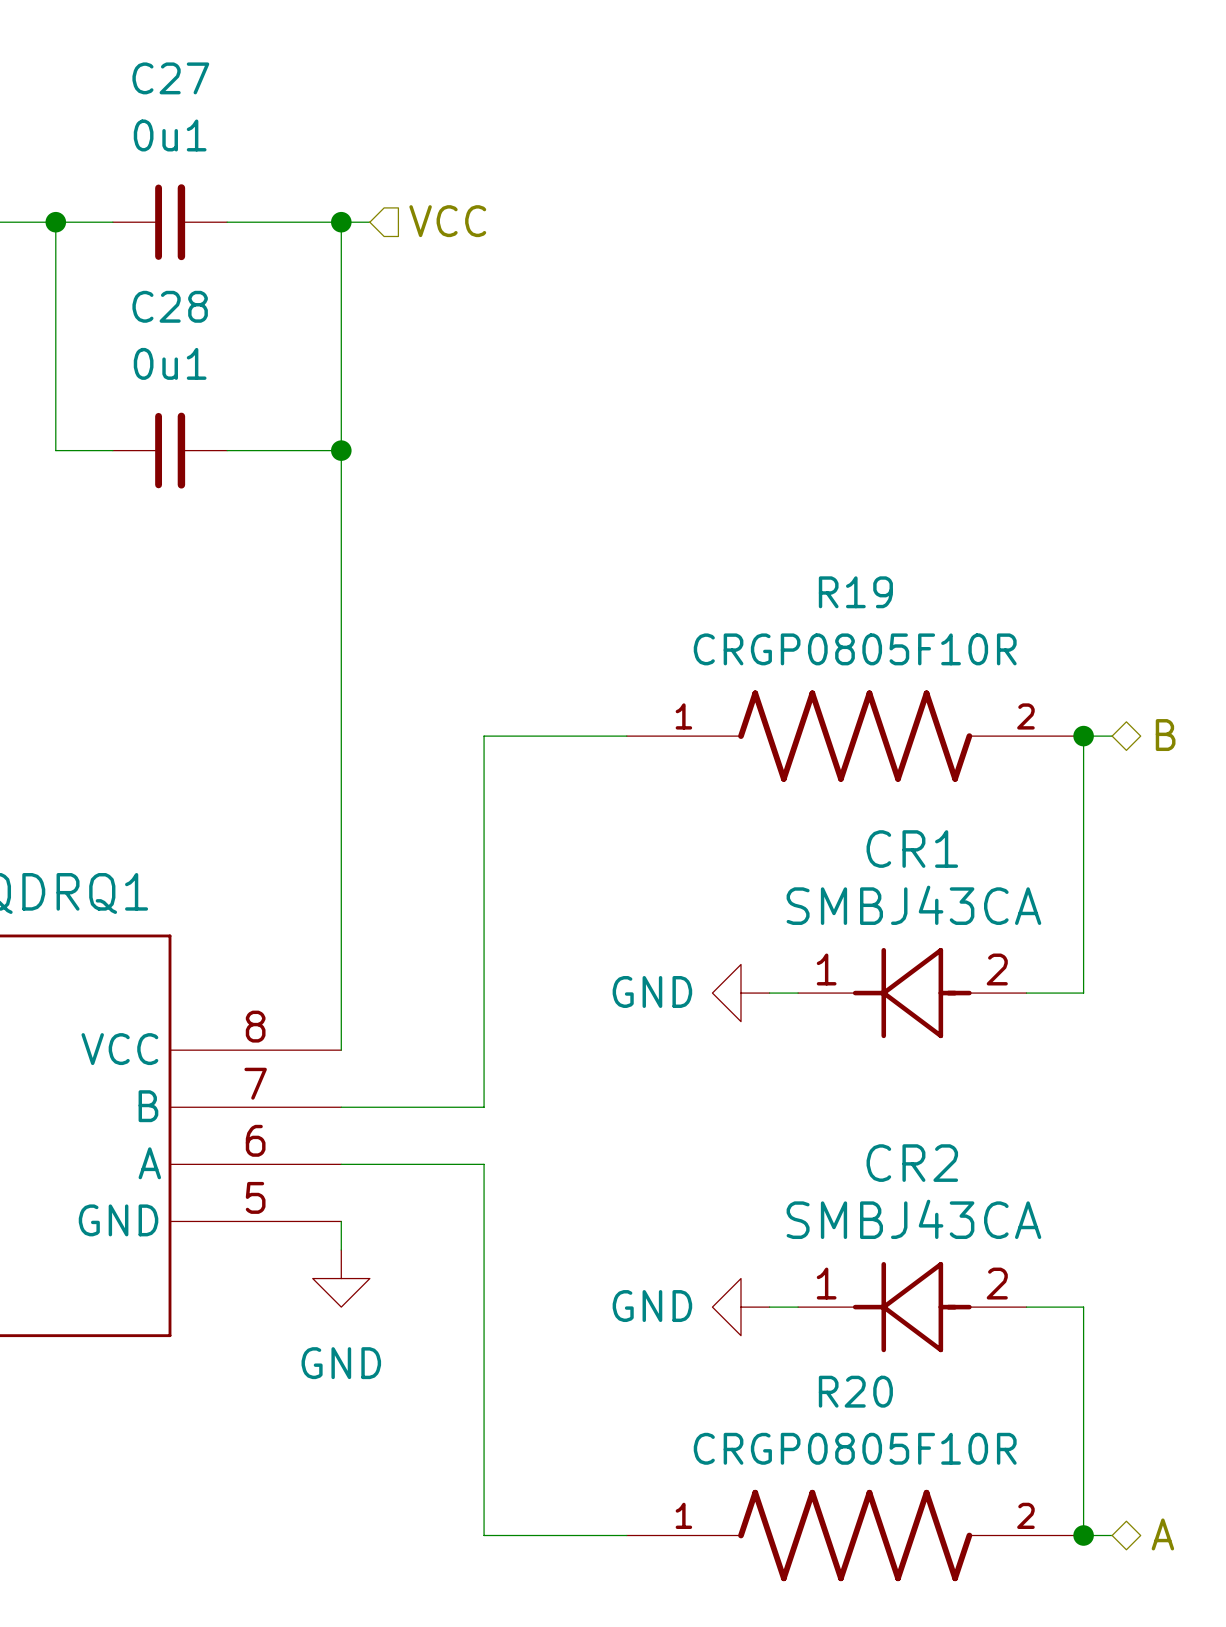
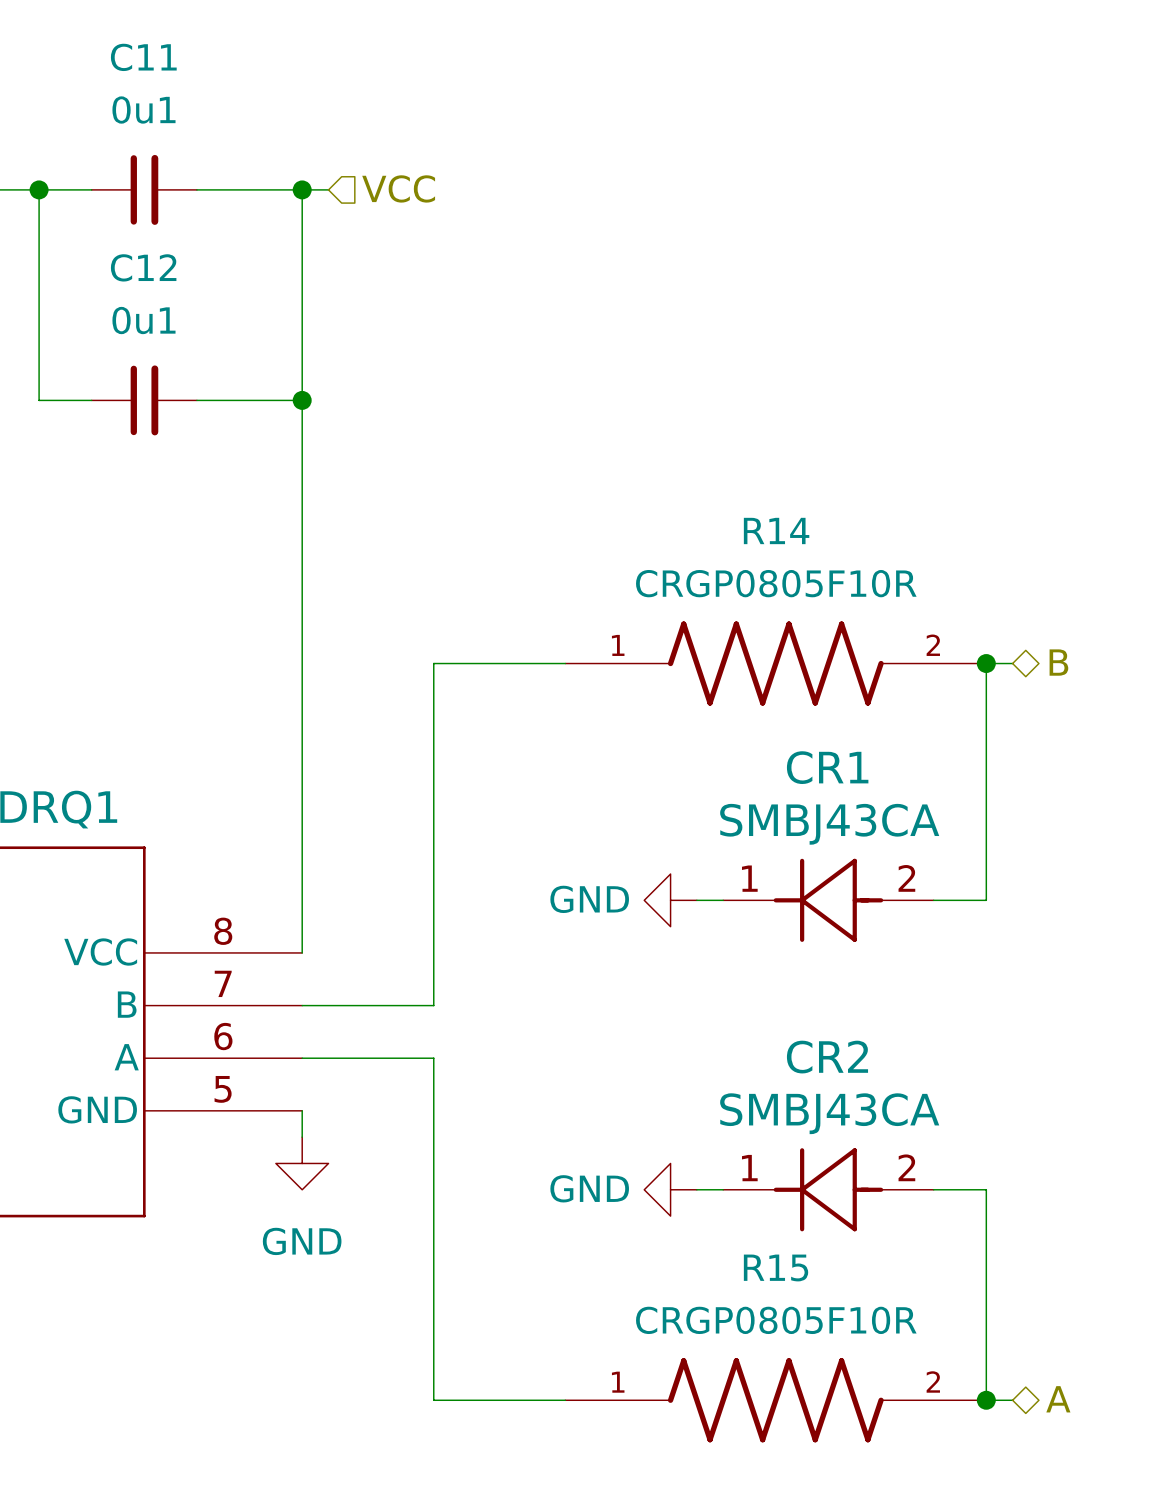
C27 name: C27 (170, 78) -> C11 (143, 57)
C28 name: C28 (170, 306) -> C12 (143, 267)
R19 name: R19 (855, 592) -> R14 (776, 530)
R20 name: R20 (855, 1391) -> R15 (776, 1267)

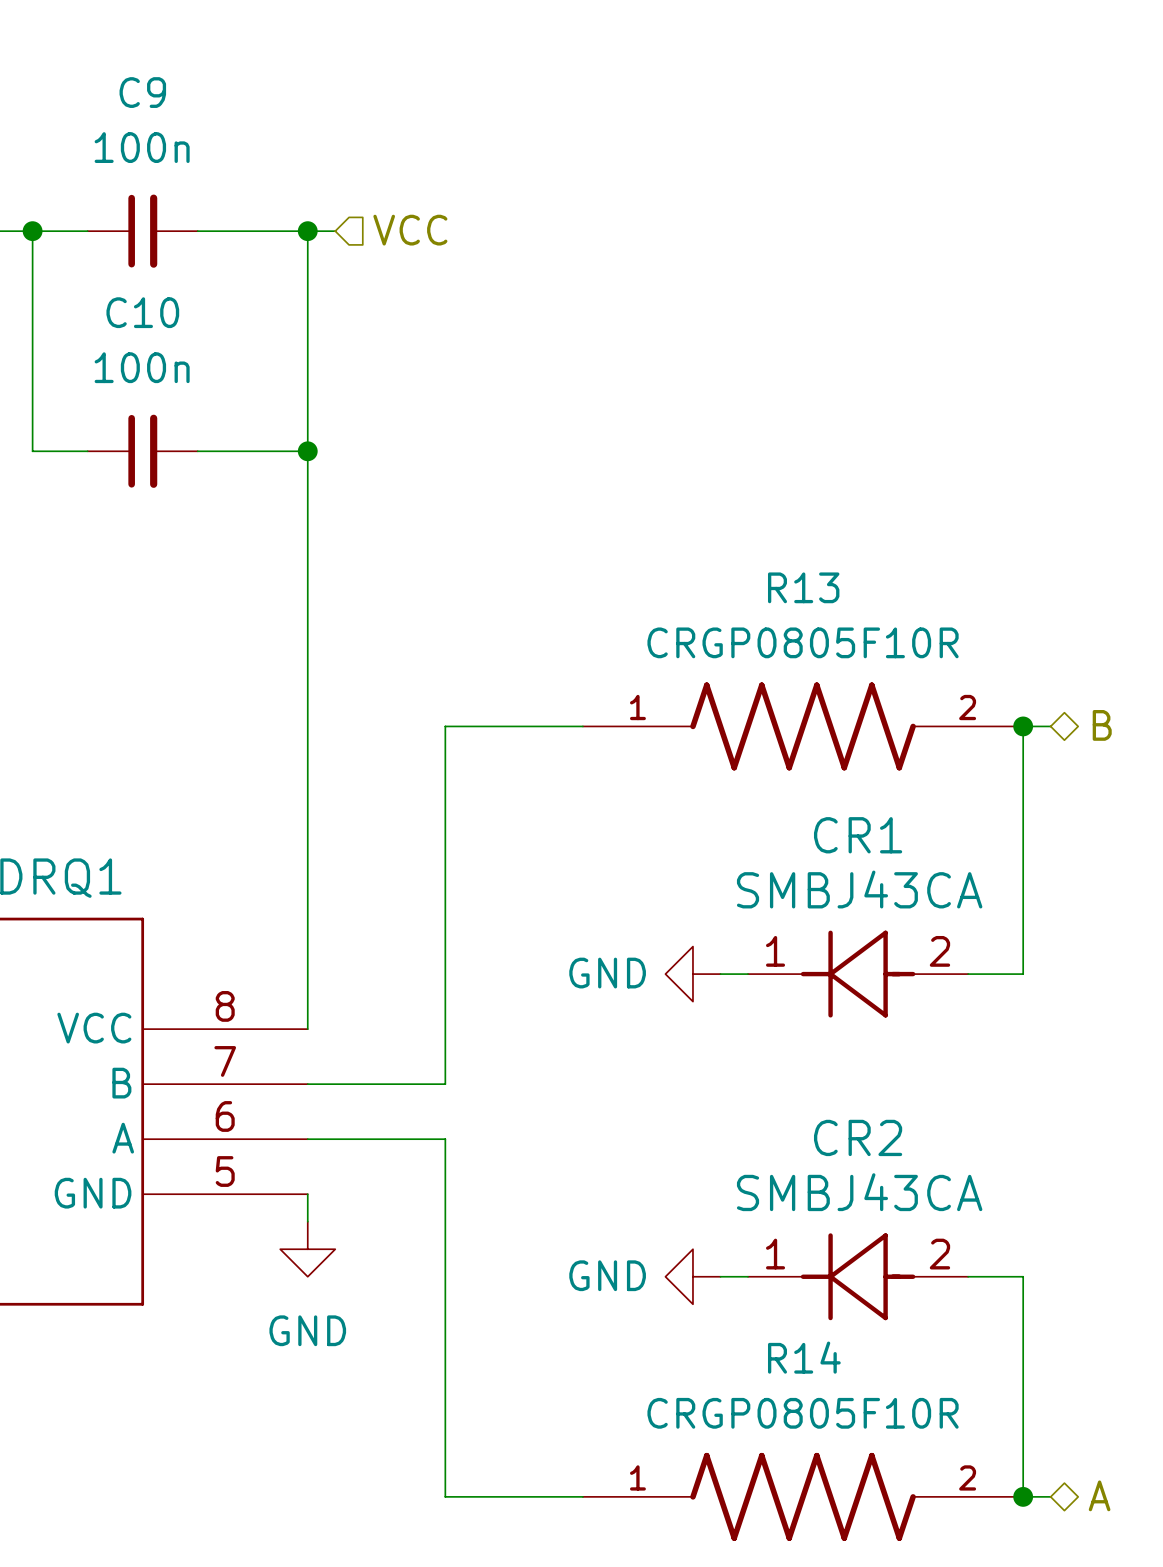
C11 name: C11 (143, 57) -> C9 (142, 92)
C11 value: 0u1 (143, 110) -> 100n (142, 147)
C12 name: C12 (143, 267) -> C10 (142, 312)
C12 value: 0u1 (143, 320) -> 100n (142, 367)
R14 name: R14 (776, 530) -> R13 (803, 587)
R15 name: R15 (776, 1267) -> R14 (804, 1357)

